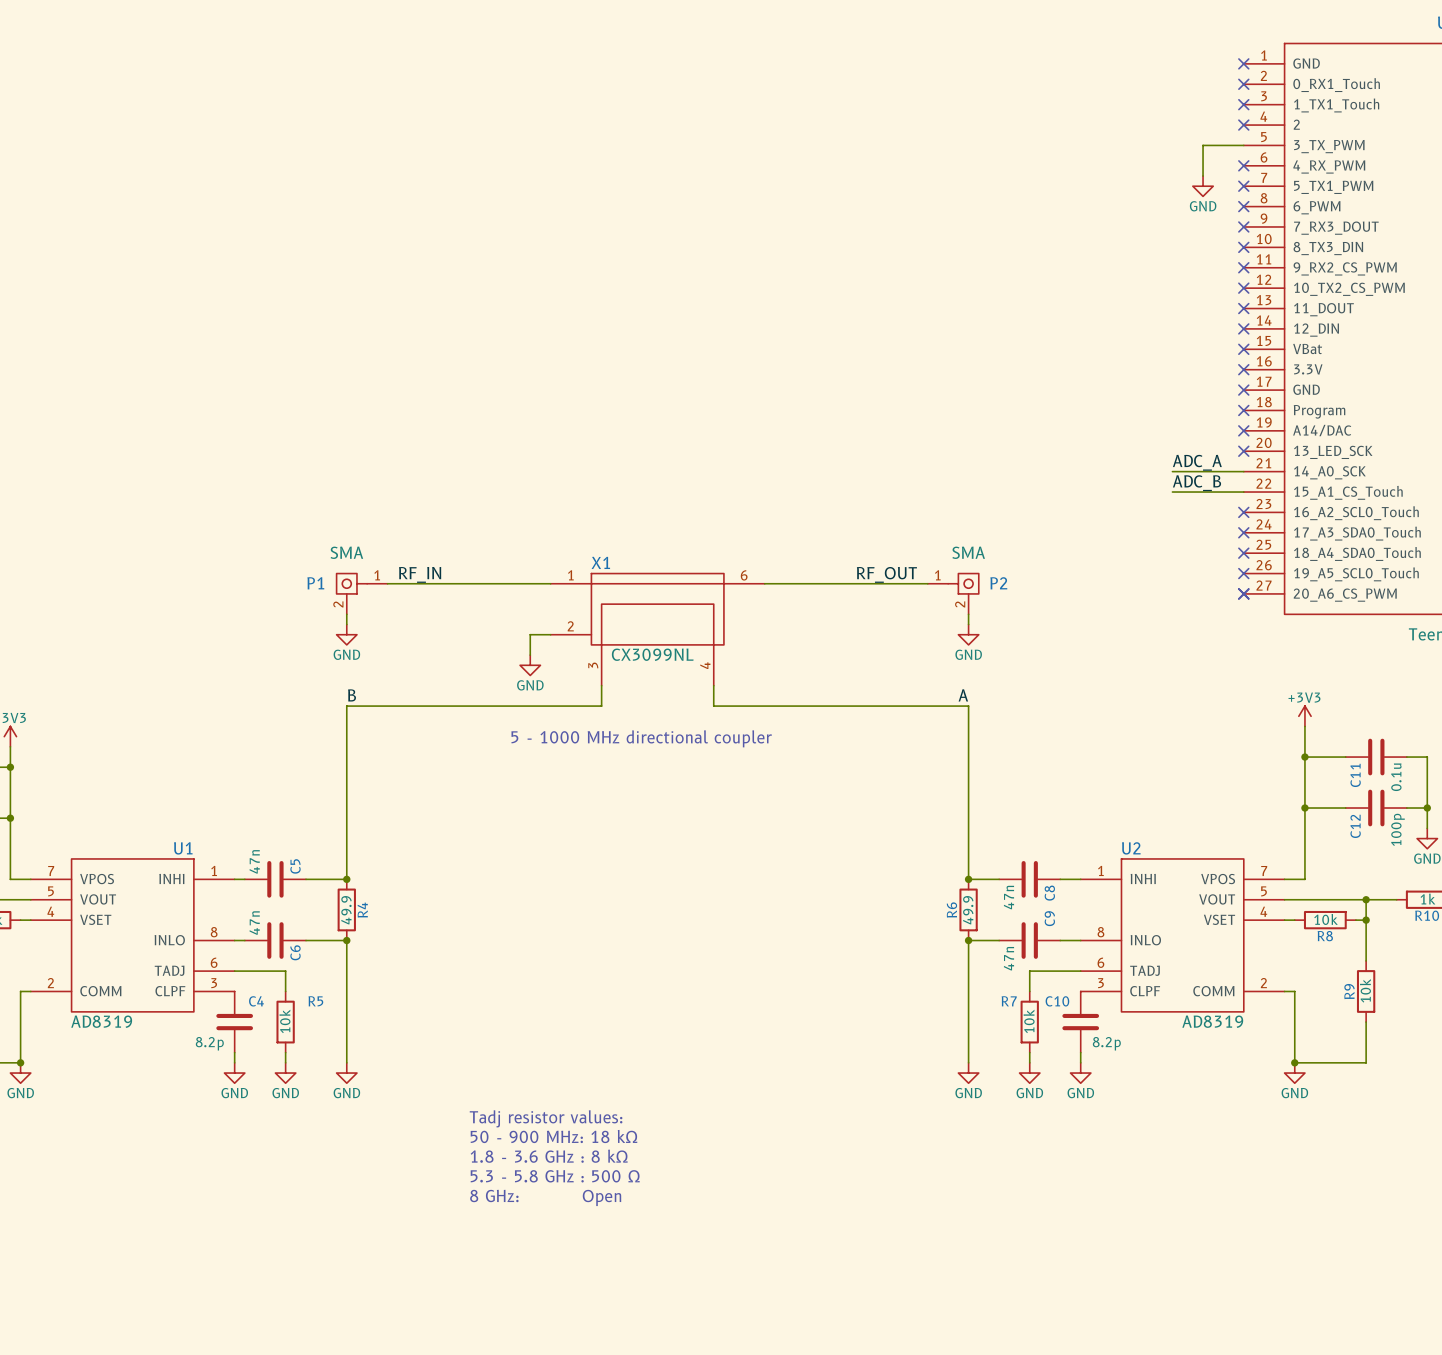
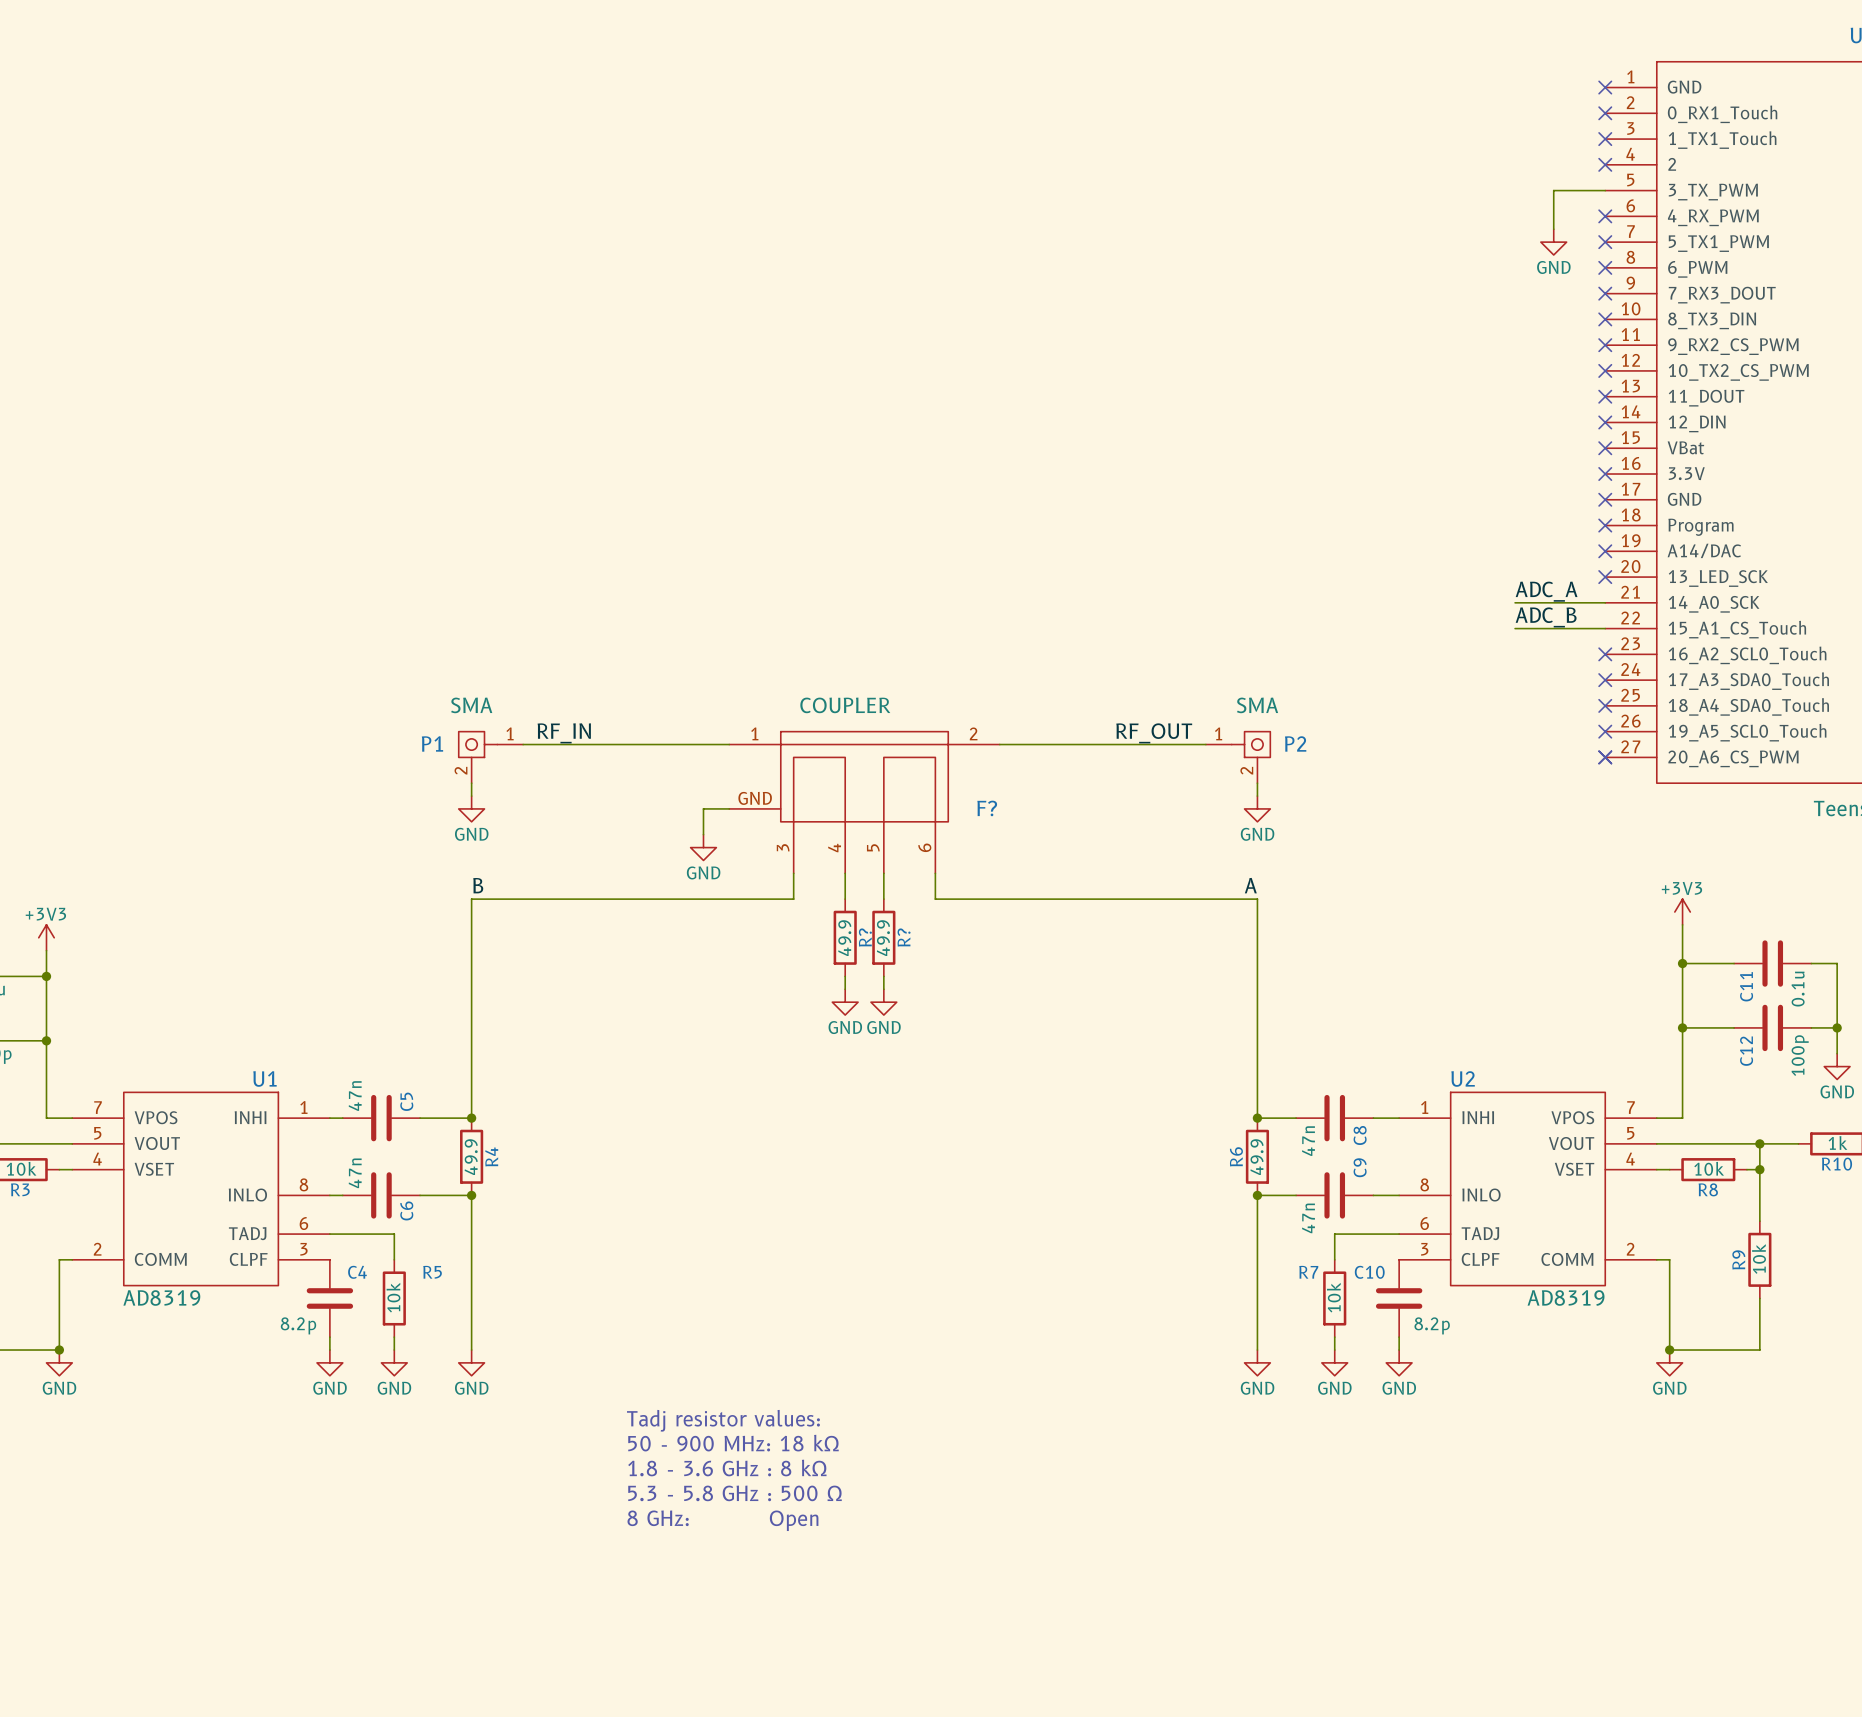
X1: CX3099NL (657, 629) -> none
F?: none -> COUPLER (864, 802)
wire: none -> (845, 873) (845, 899)
wire: none -> (883, 873) (883, 899)
R?: none -> 49.9 (845, 937)
R?: none -> 49.9 (883, 937)
text: 5 - 1000 MHz directional coupler (641, 738) -> none
wire: none -> (845, 976) (845, 989)
wire: none -> (883, 976) (883, 989)
power symbol: none -> GND (845, 1002)
power symbol: none -> GND (883, 1002)

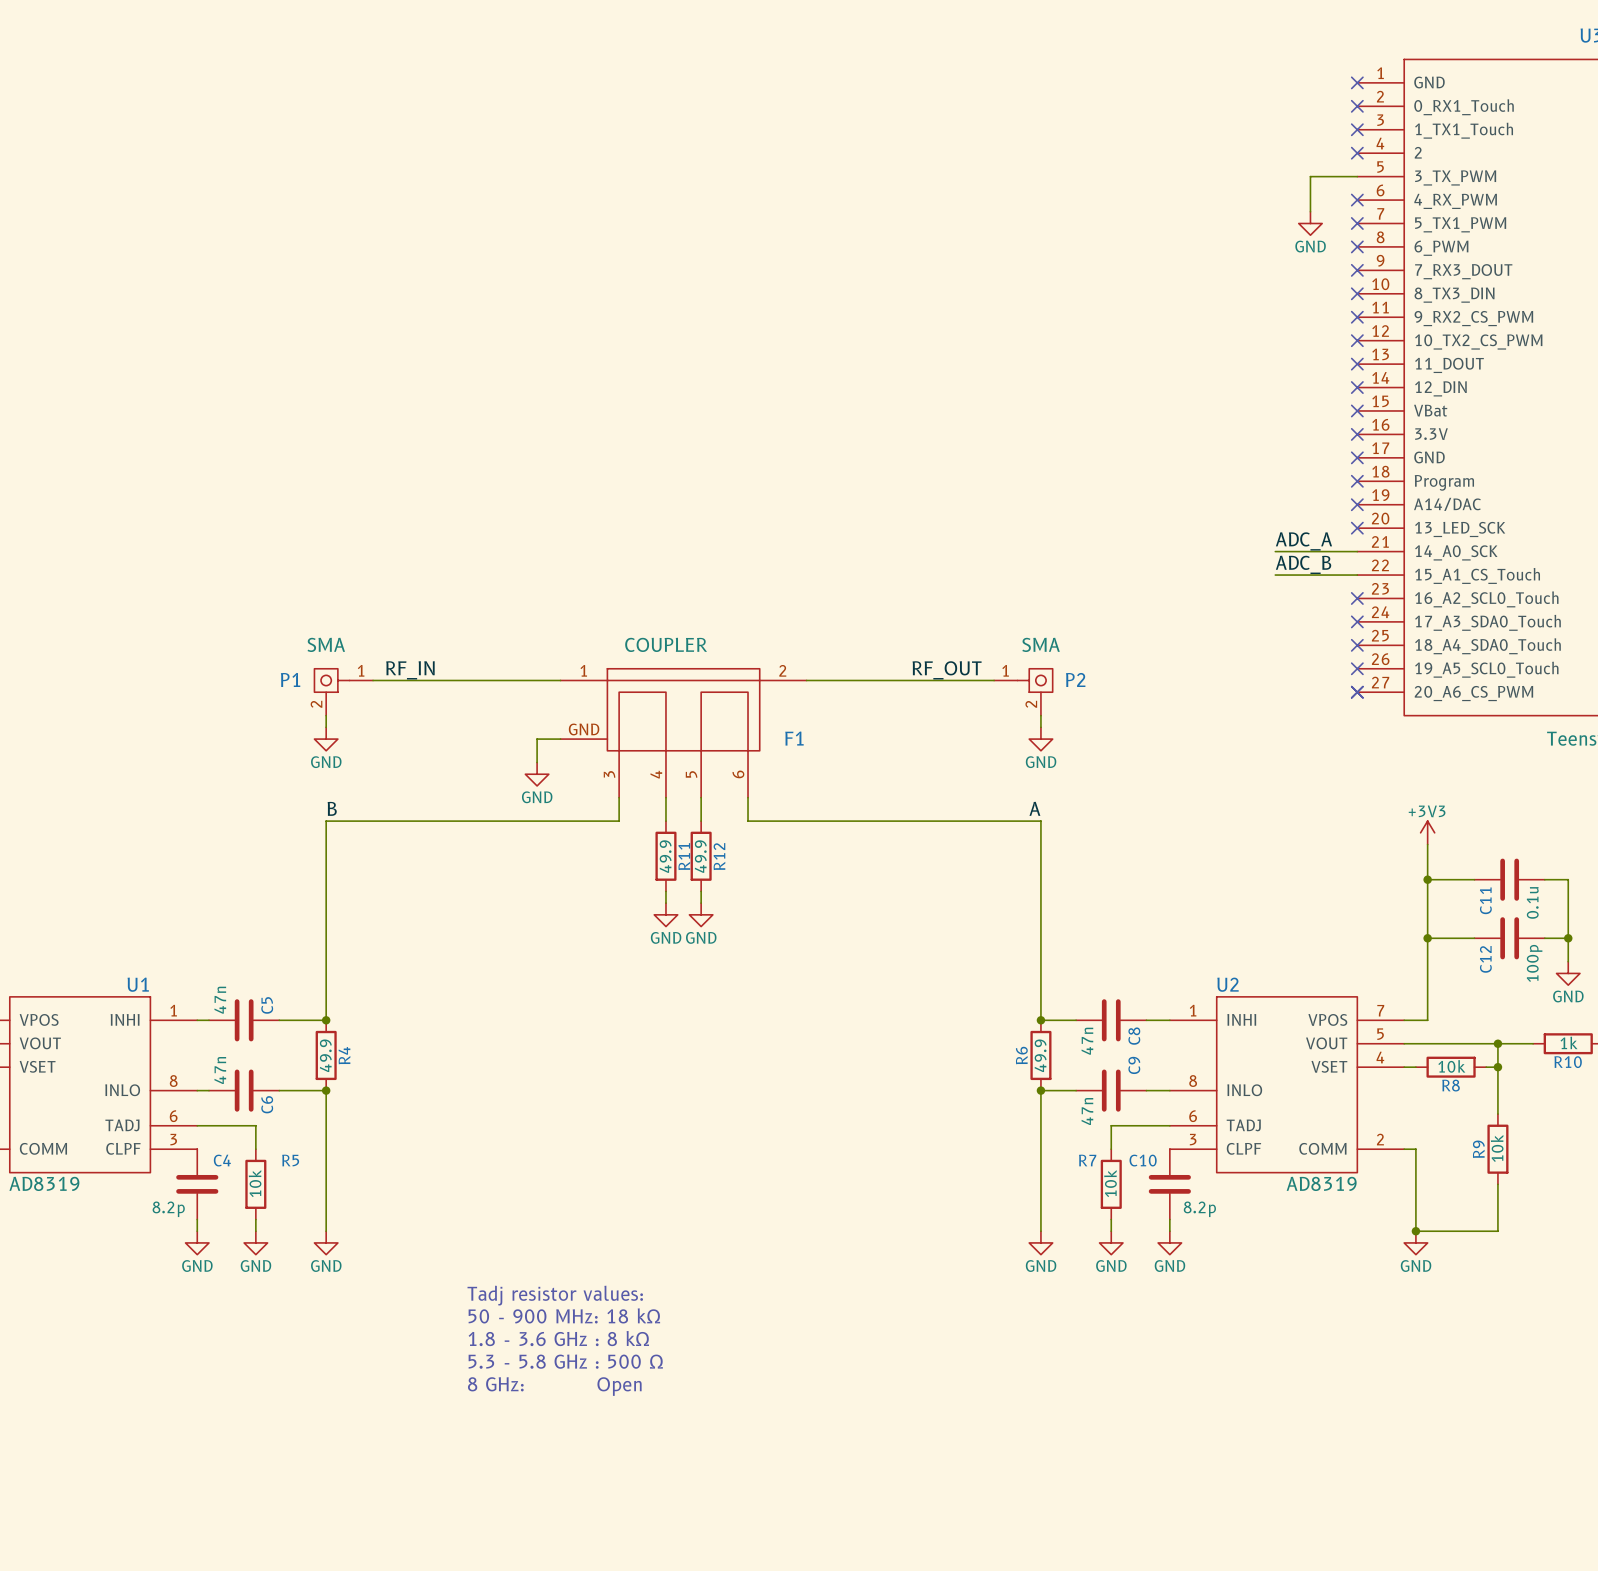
F? name: F? (987, 808) -> F1 (794, 738)
R? name: R? (865, 937) -> R11 (684, 856)
R? name: R? (904, 937) -> R12 (719, 856)

